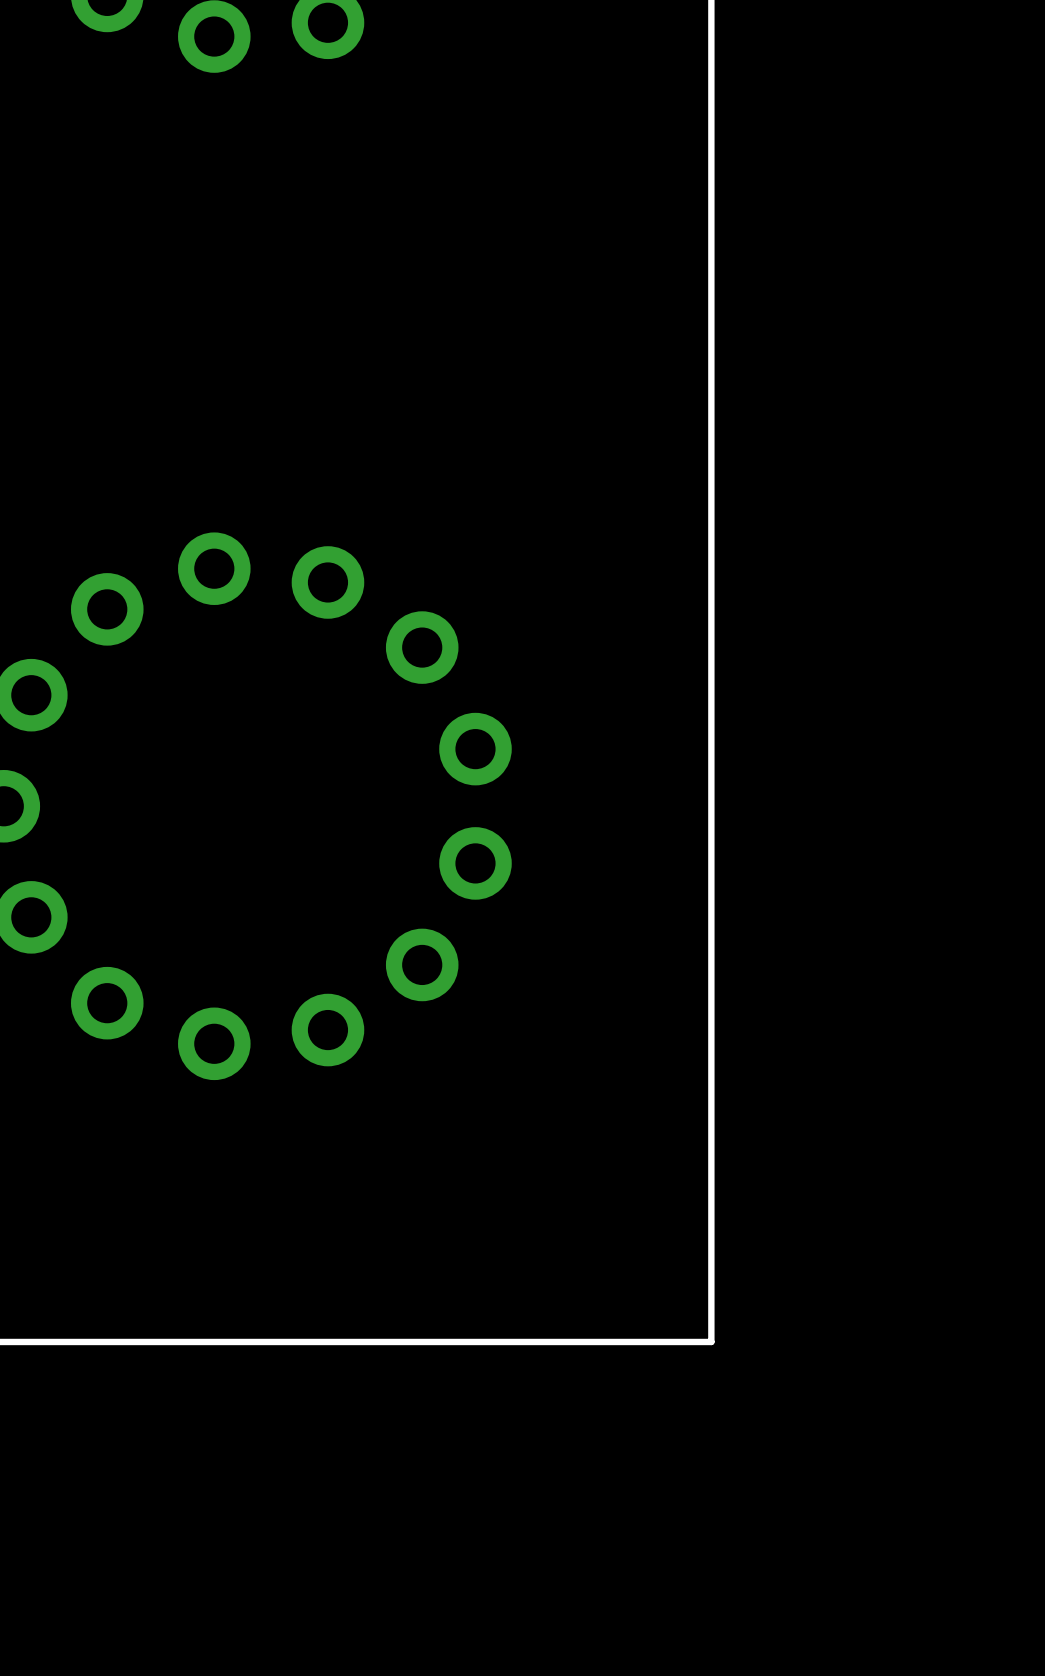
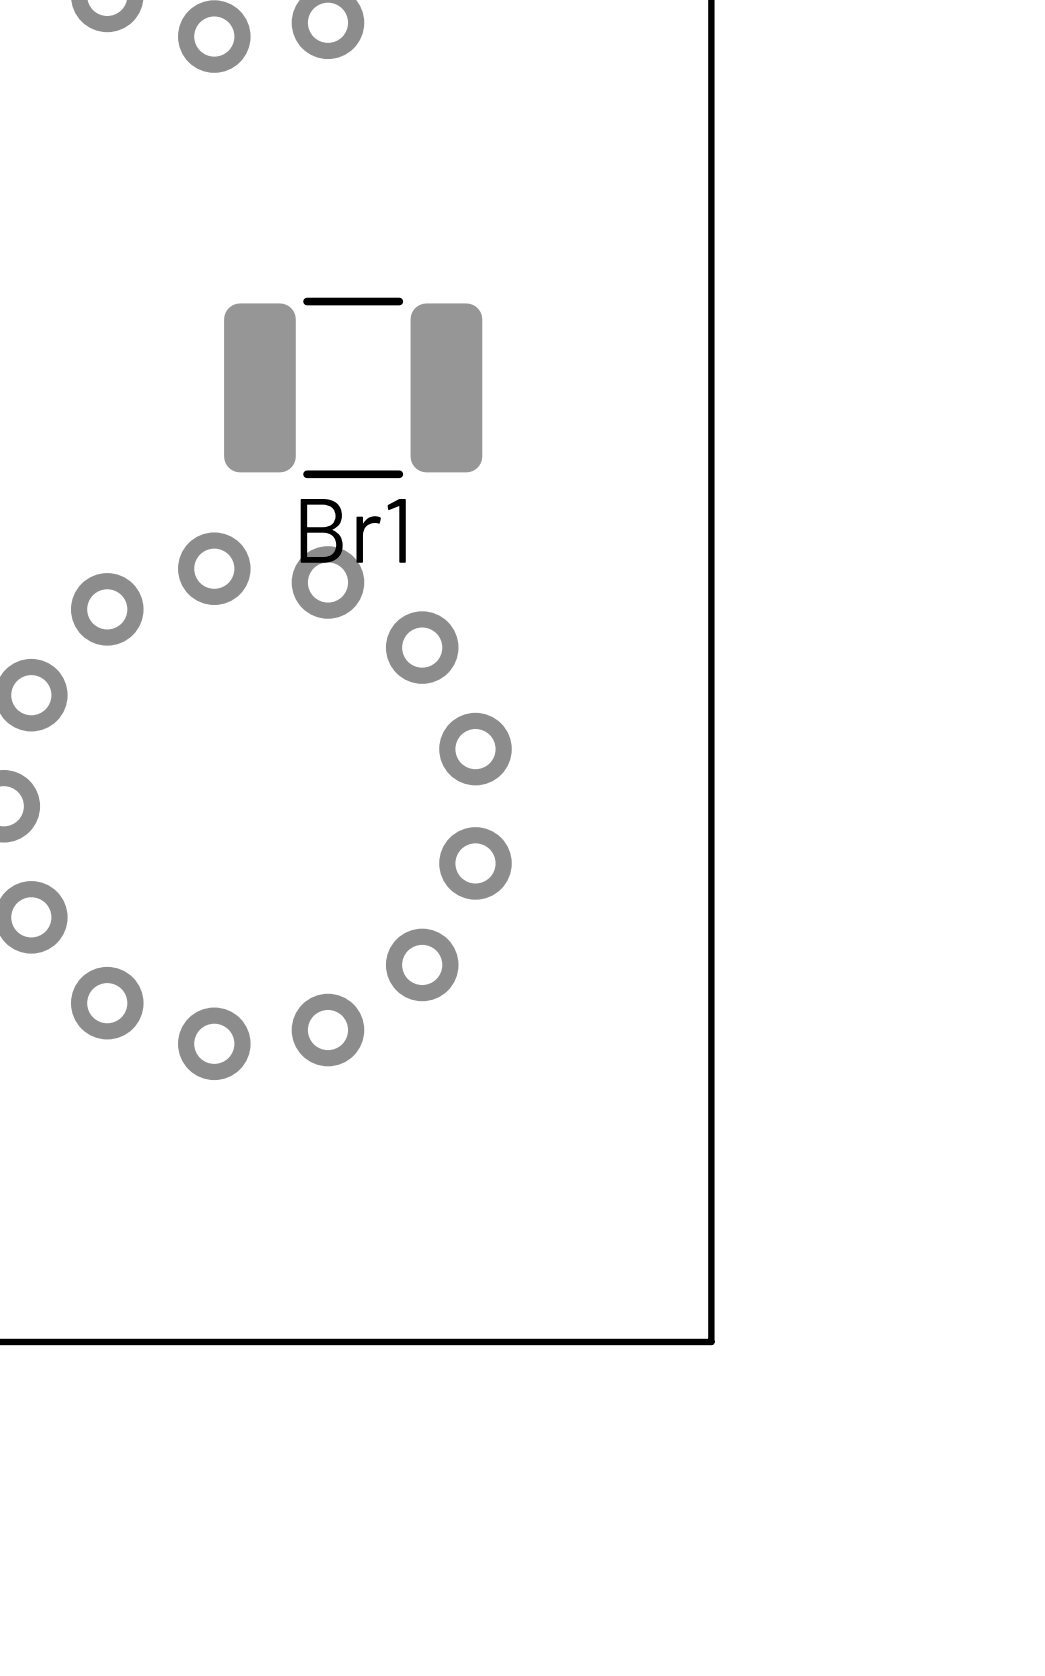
Br1: none -> (353, 387)

